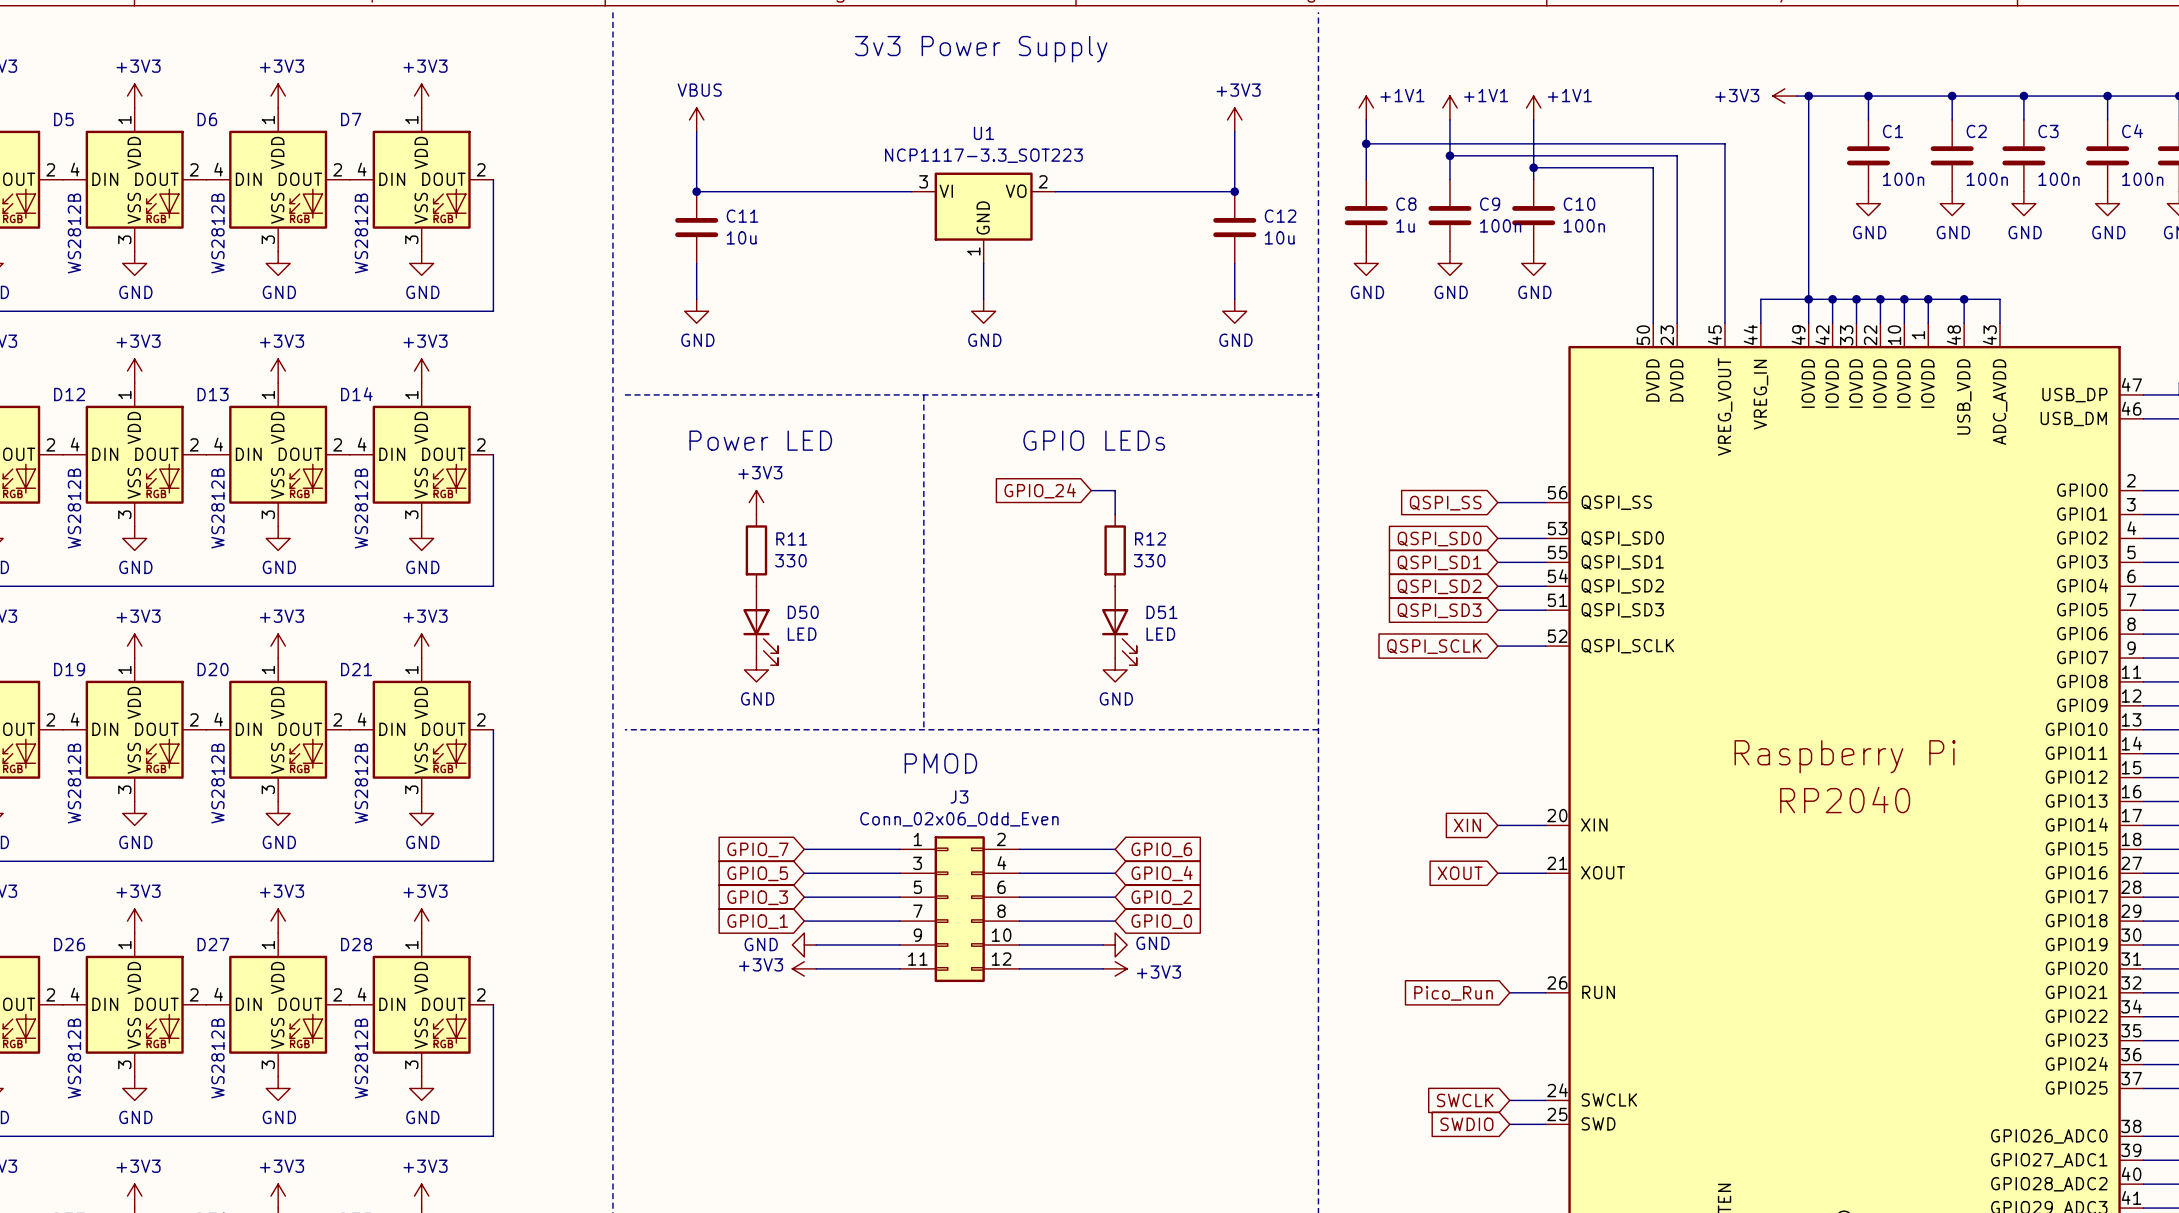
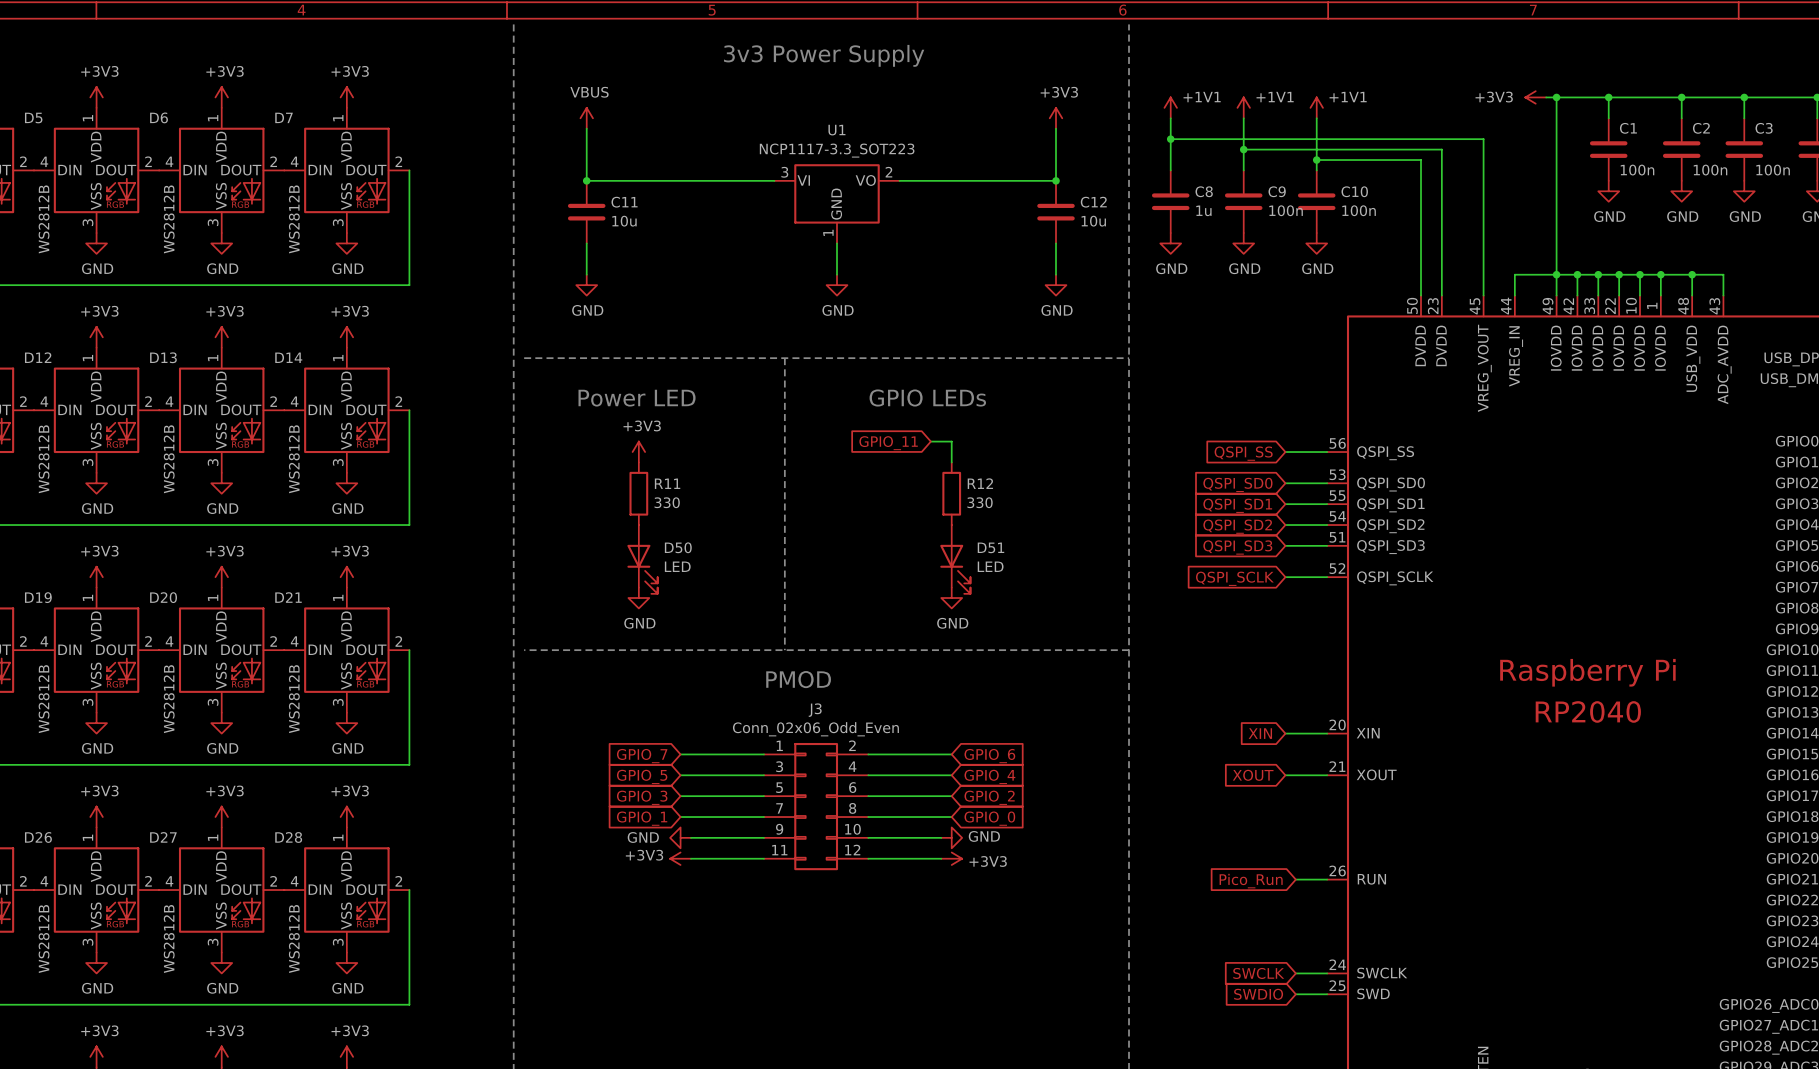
global label: GPIO_24 (1040, 490) -> GPIO_11 (888, 443)

